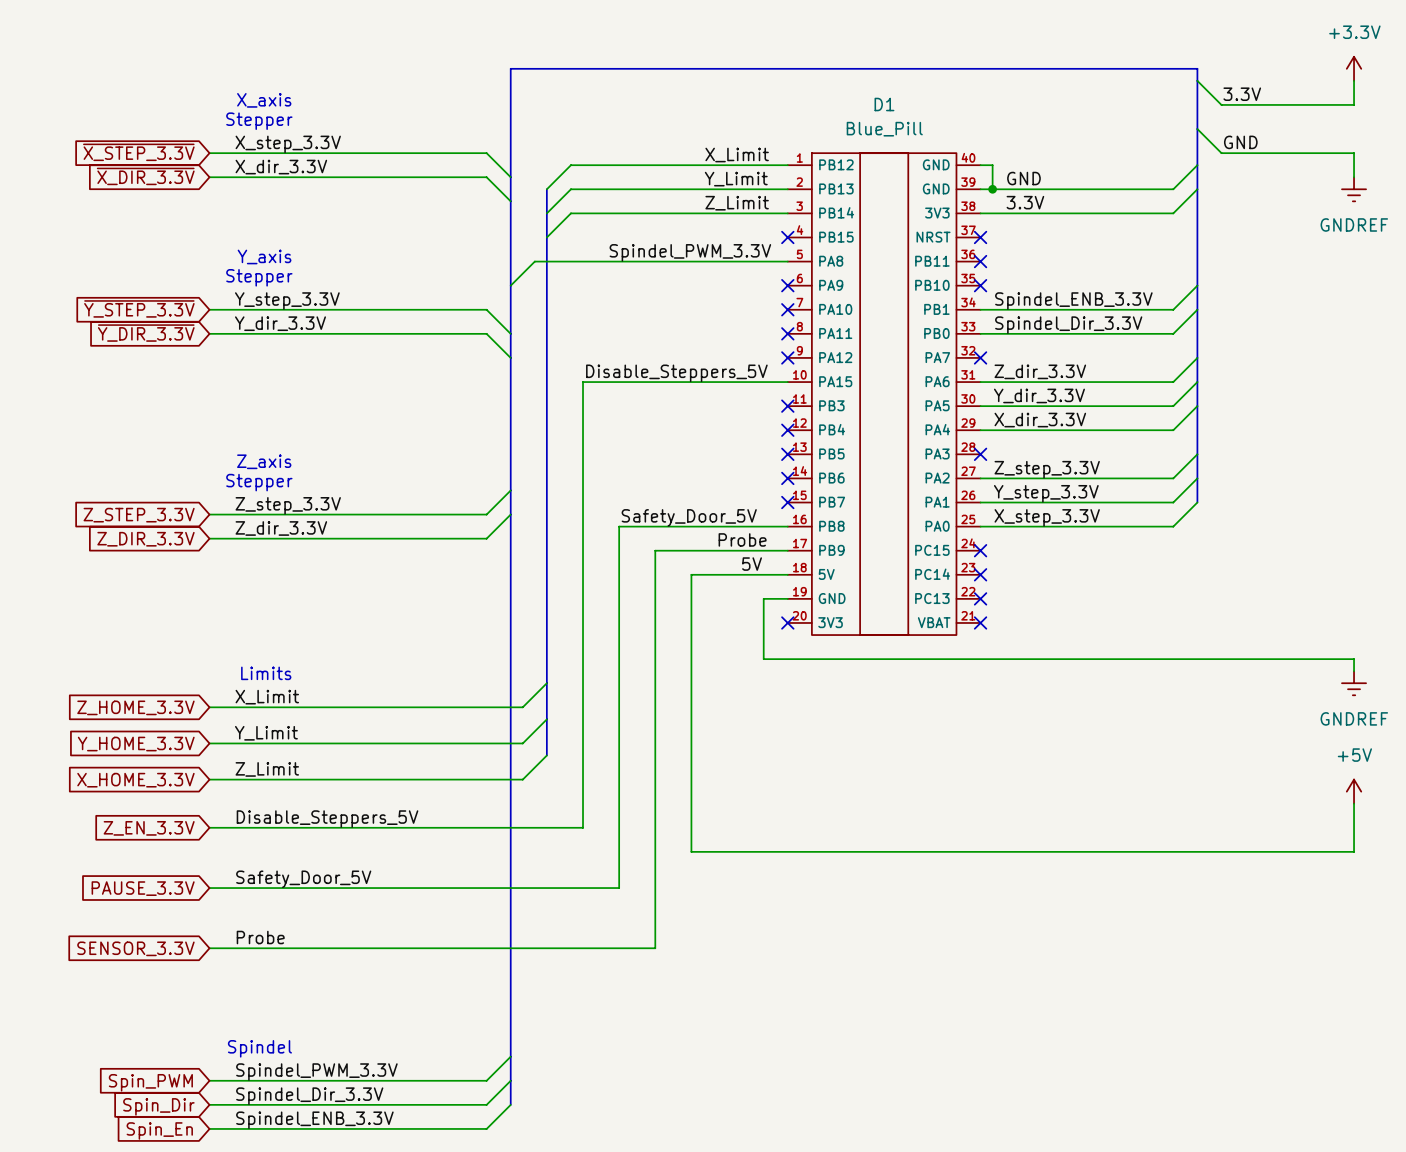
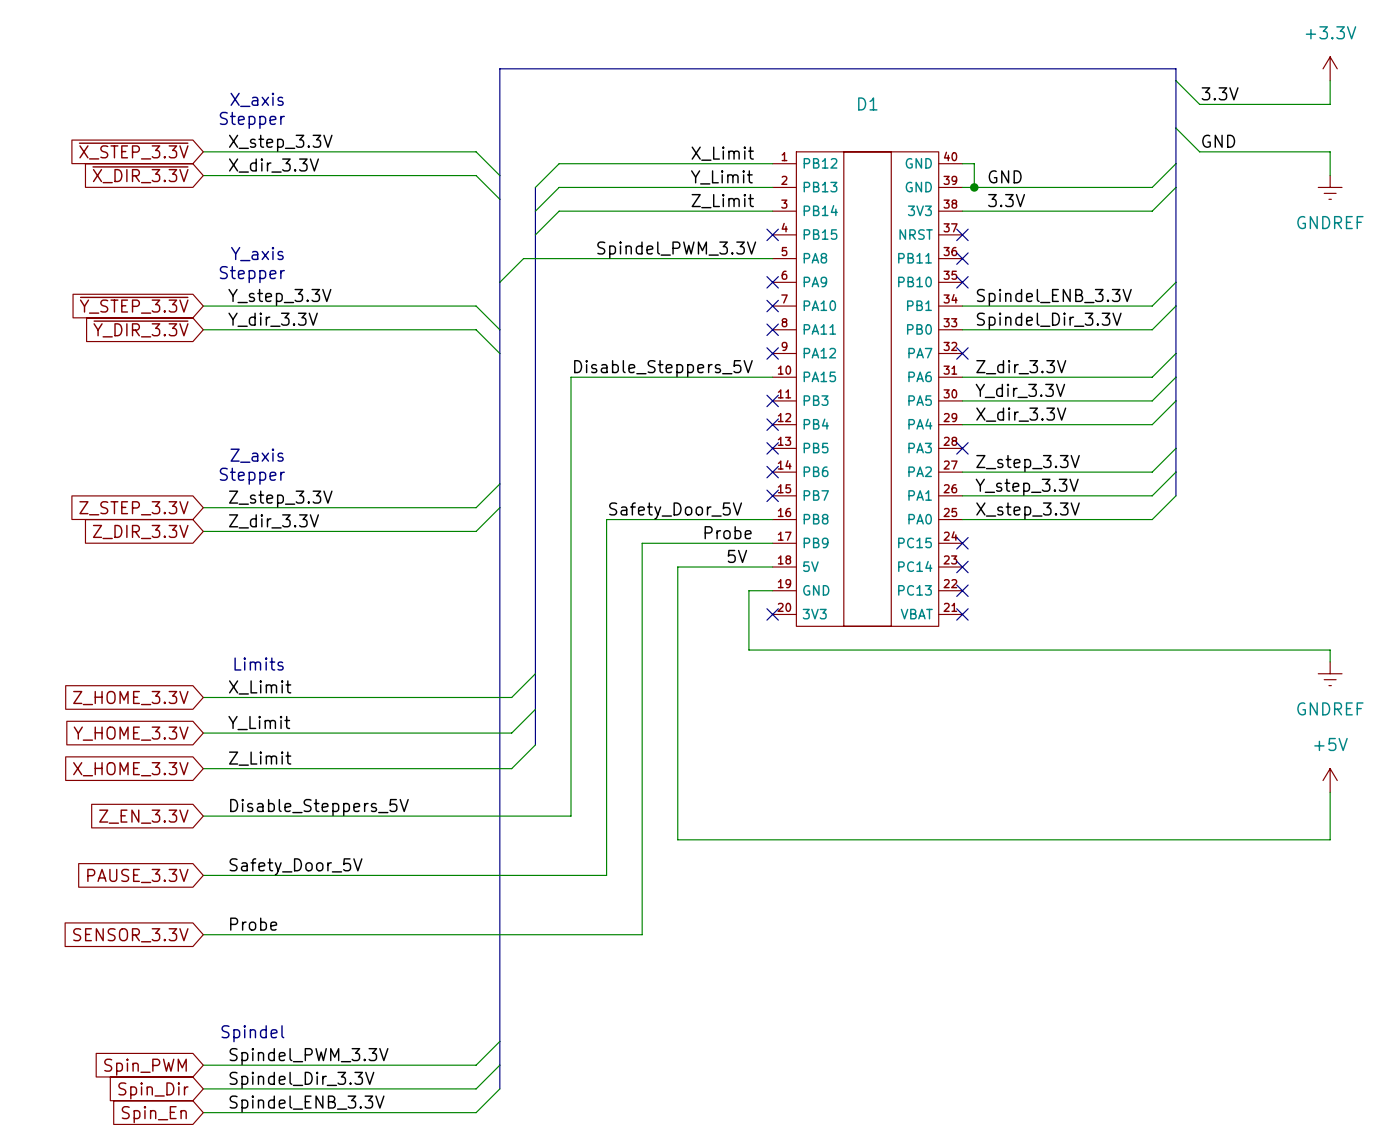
D1 value: Blue_Pill (884, 129) -> none

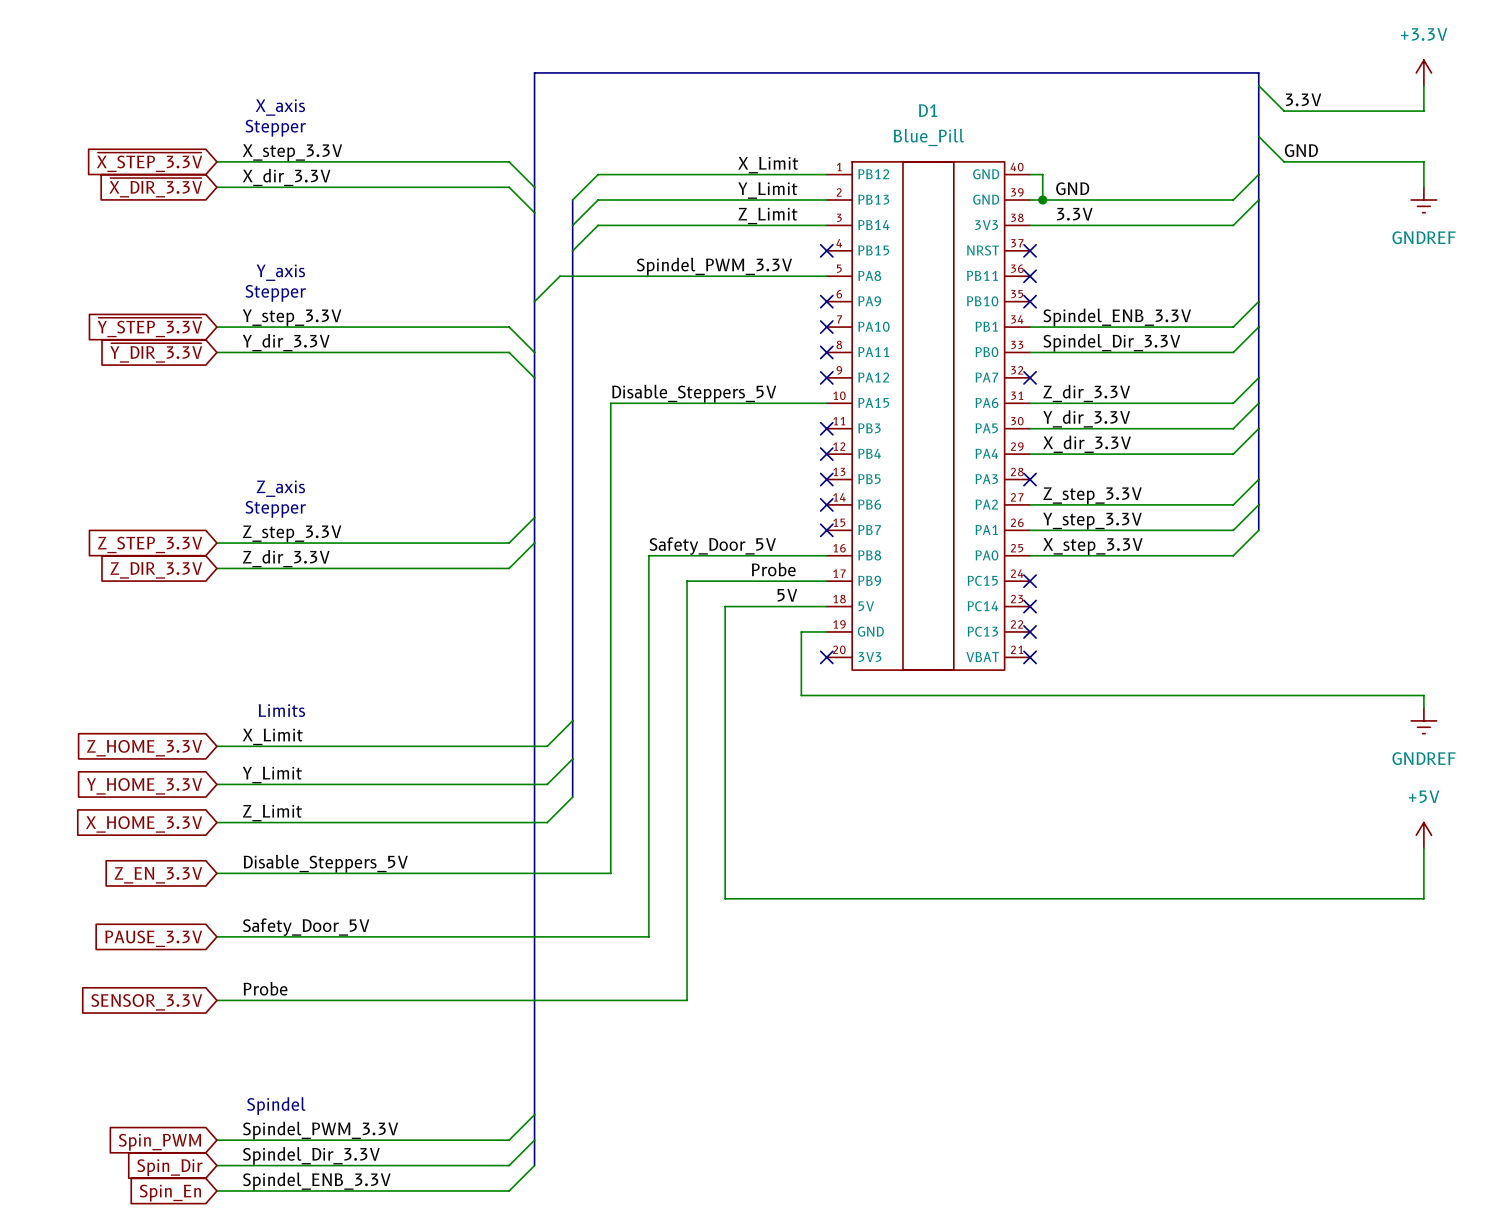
D1 value: none -> Blue_Pill (928, 137)

